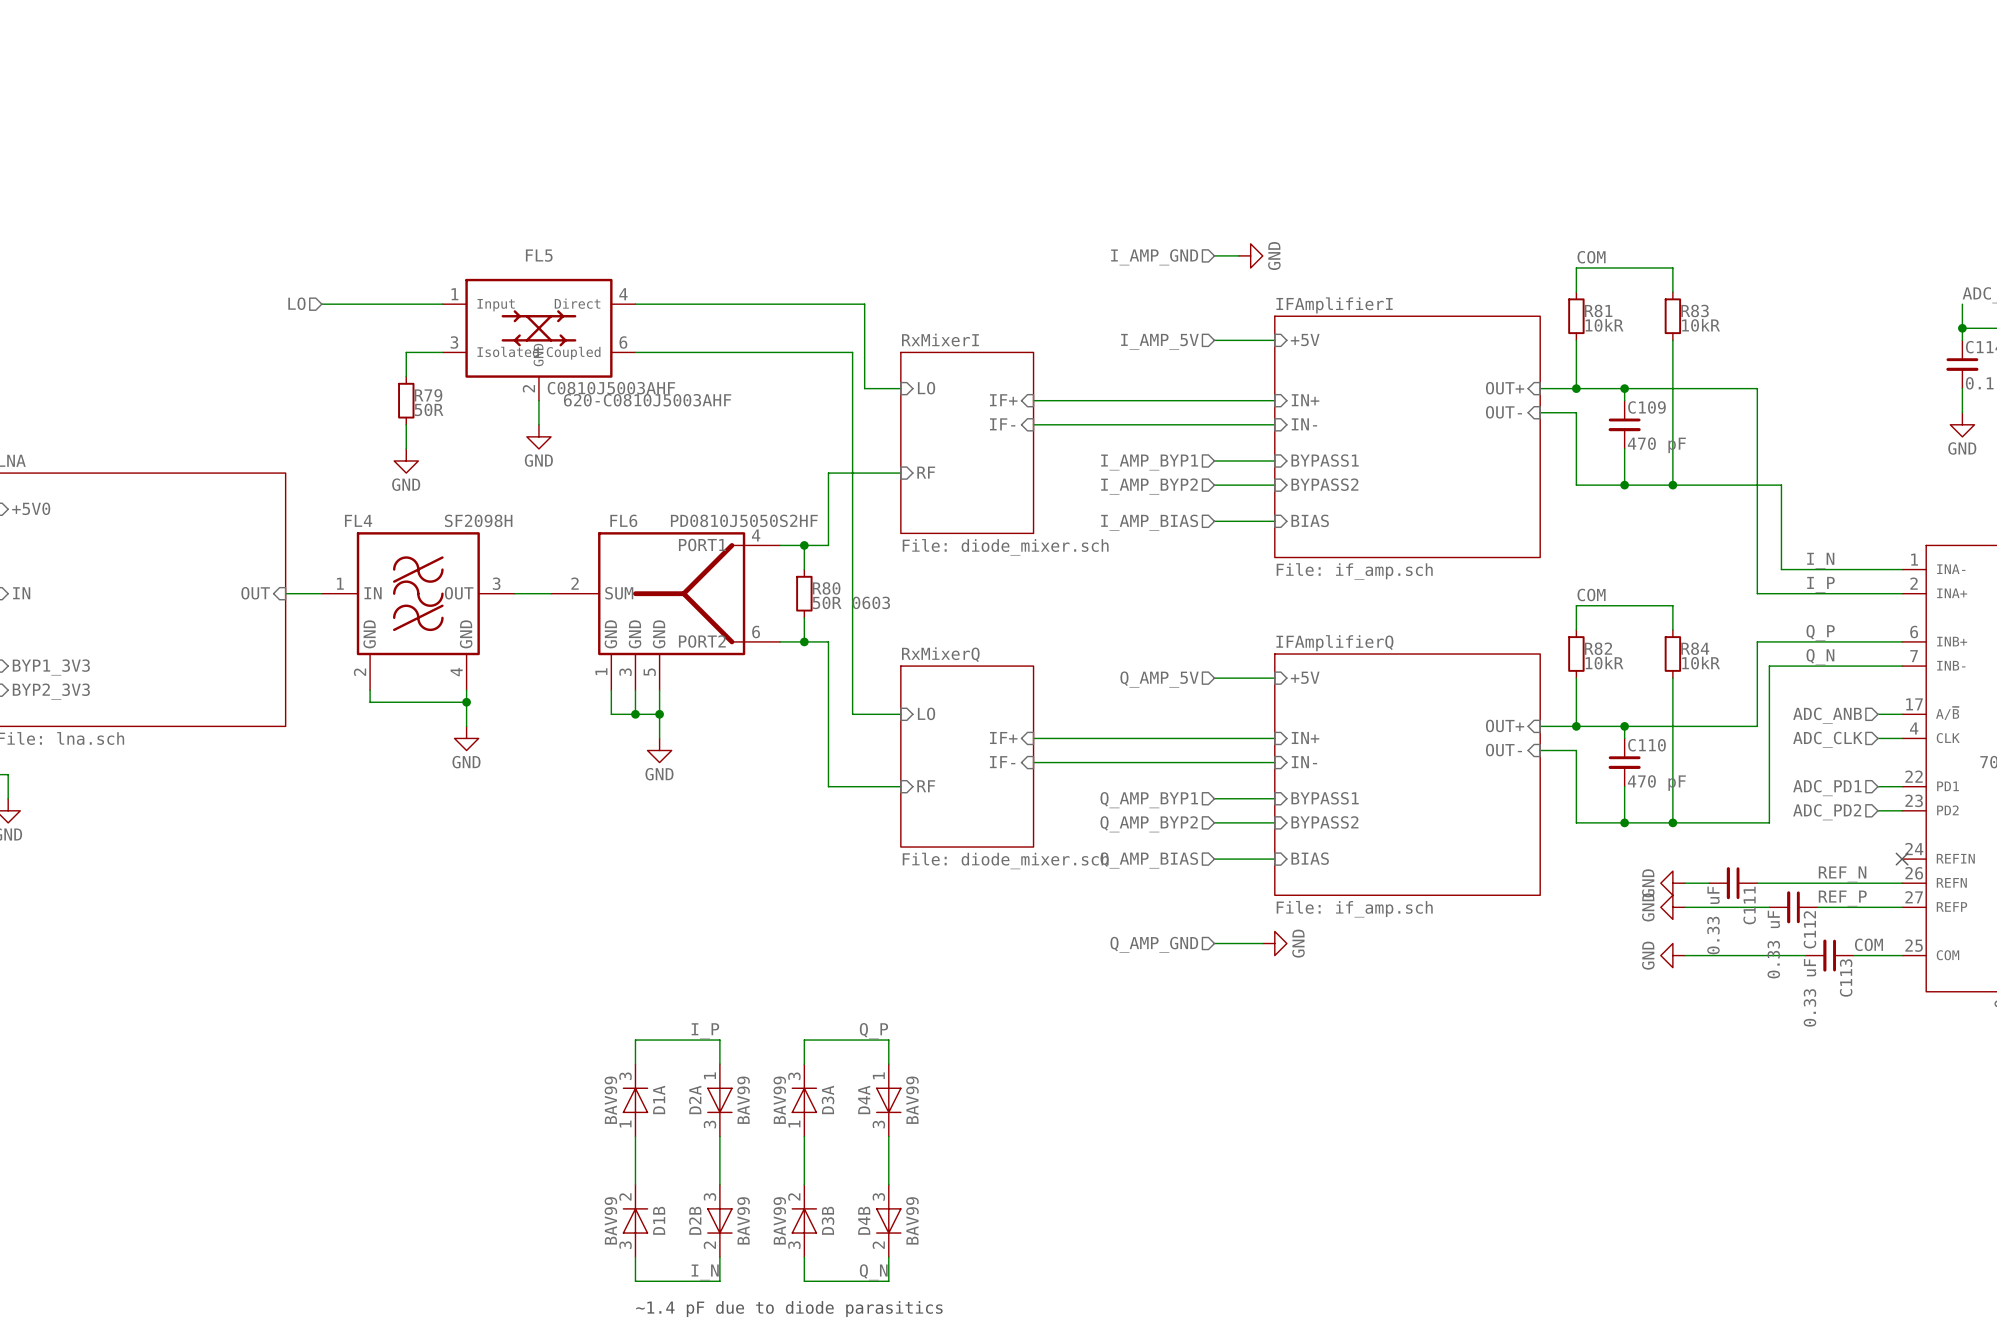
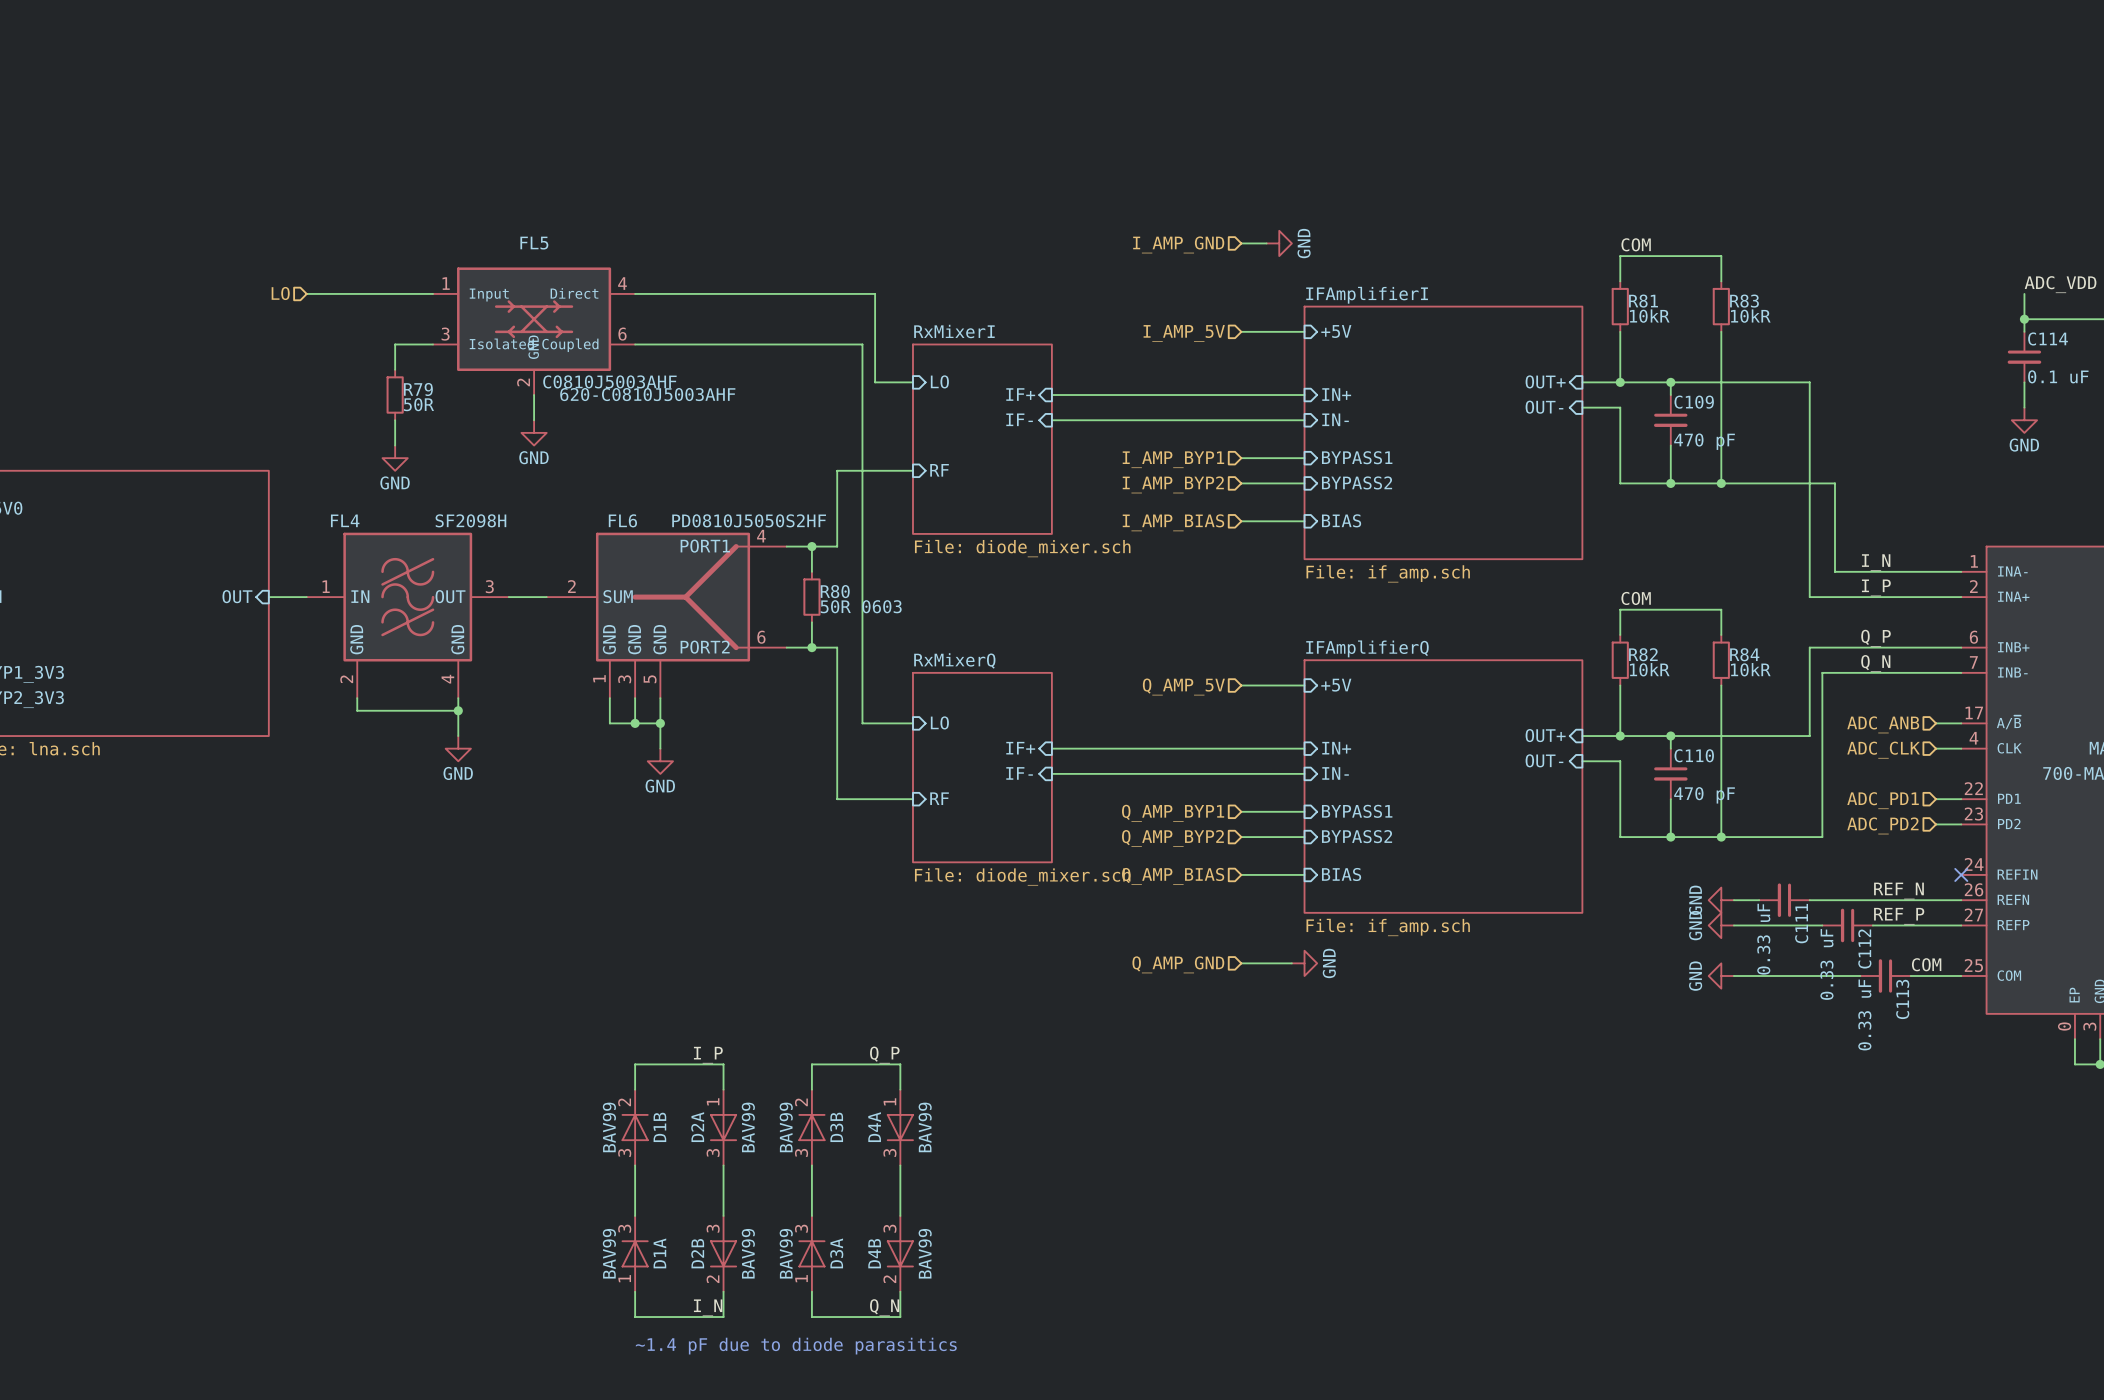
D1A position: (635, 1100) -> (635, 1253)
D3A position: (804, 1100) -> (811, 1253)
D1B position: (635, 1220) -> (635, 1127)
D3B position: (804, 1220) -> (811, 1127)

